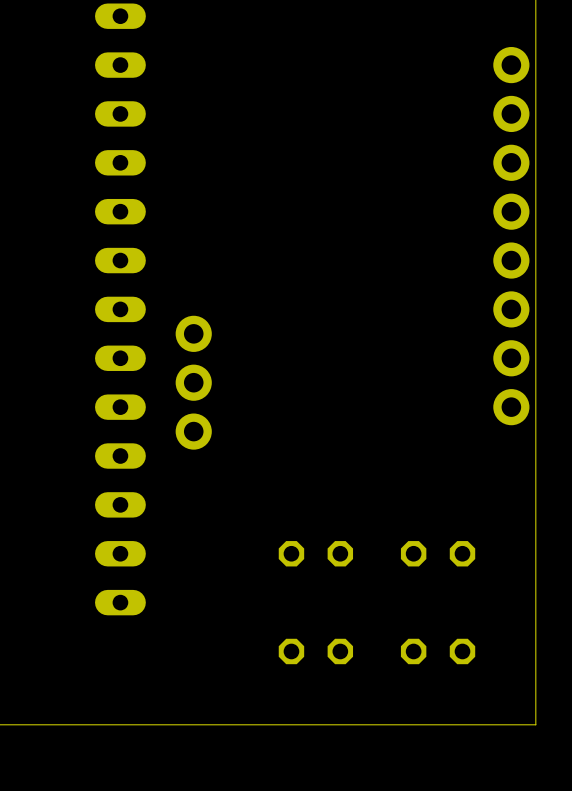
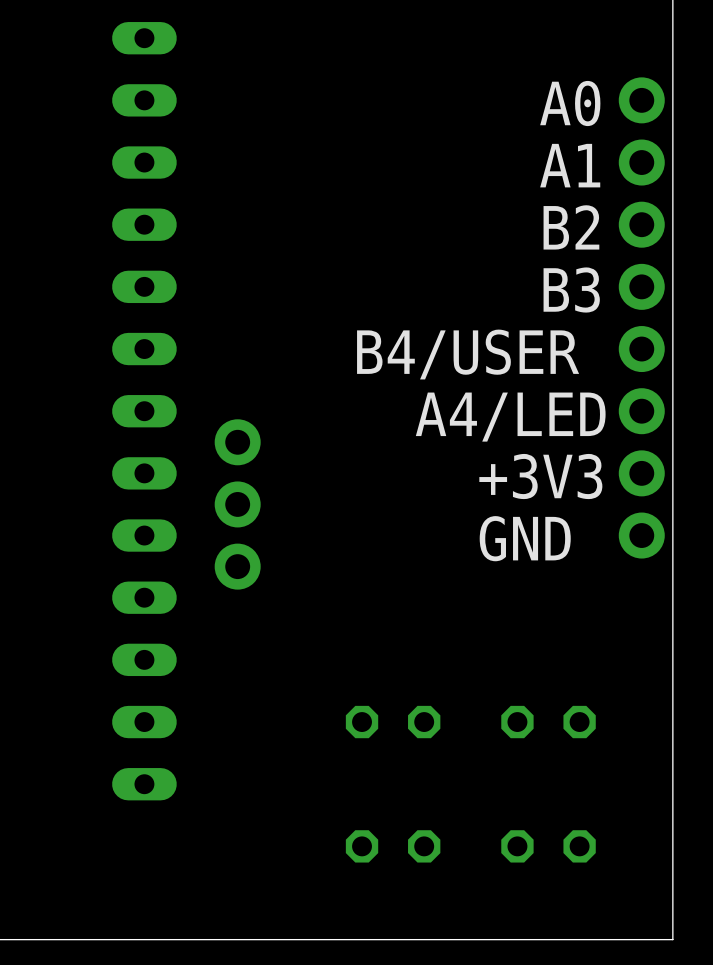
text: none -> A0 (570, 103)
text: none -> A1 (570, 165)
text: none -> B2 (571, 227)
text: none -> B3 (571, 290)
text: none -> B4/USER (468, 354)
text: none -> A4/LED (510, 417)
text: none -> +3V3 (540, 476)
text: none -> GND (525, 538)

